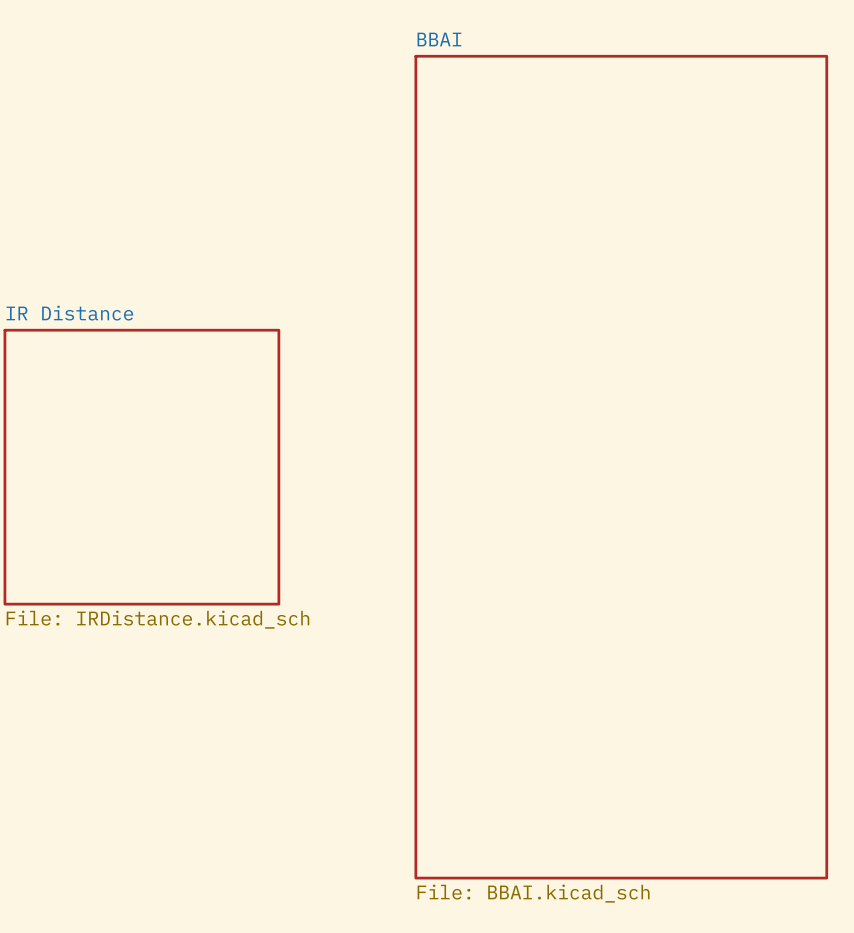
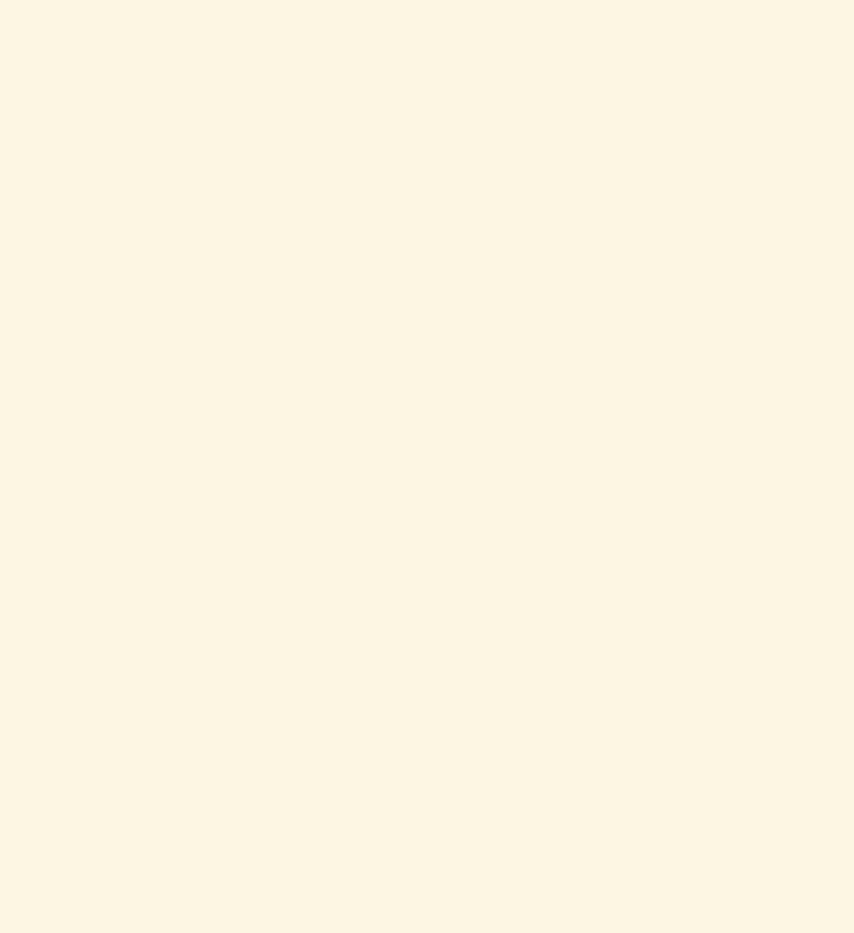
sheet IR Distance: File: IRDistance.kicad_sch (141, 467) -> none
sheet BBAI: File: BBAI.kicad_sch (621, 467) -> none

